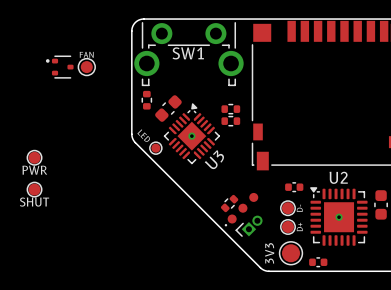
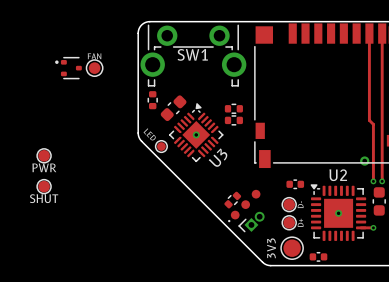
track: none -> (369, 33) (369, 120) (373, 124) (373, 181)
track: none -> (382, 33) (382, 178)
via: none -> (364, 161)
via: none -> (373, 181)
via: none -> (382, 181)
track: none -> (361, 227) (373, 227)
via: none -> (373, 227)

